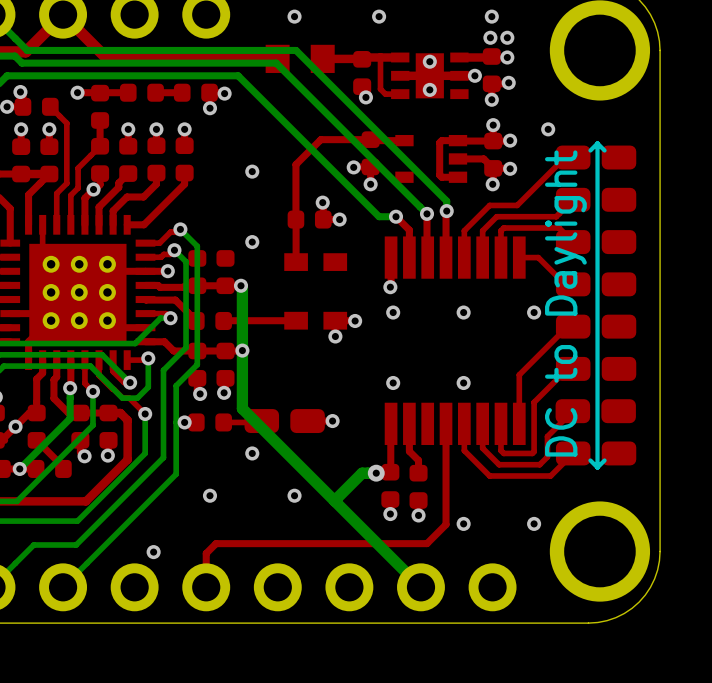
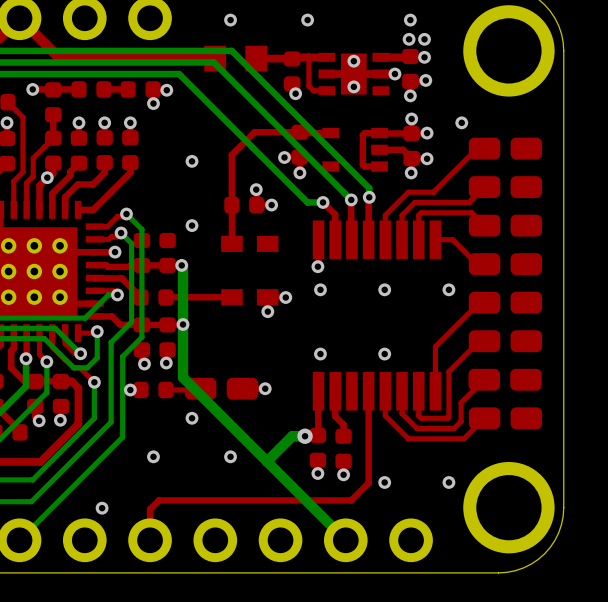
line: (597, 143) (590, 150) -> none
line: (597, 143) (604, 150) -> none
line: (597, 143) (597, 467) -> none
text: DC to Daylight (565, 303) -> none
line: (590, 460) (597, 467) -> none
line: (604, 460) (597, 467) -> none

